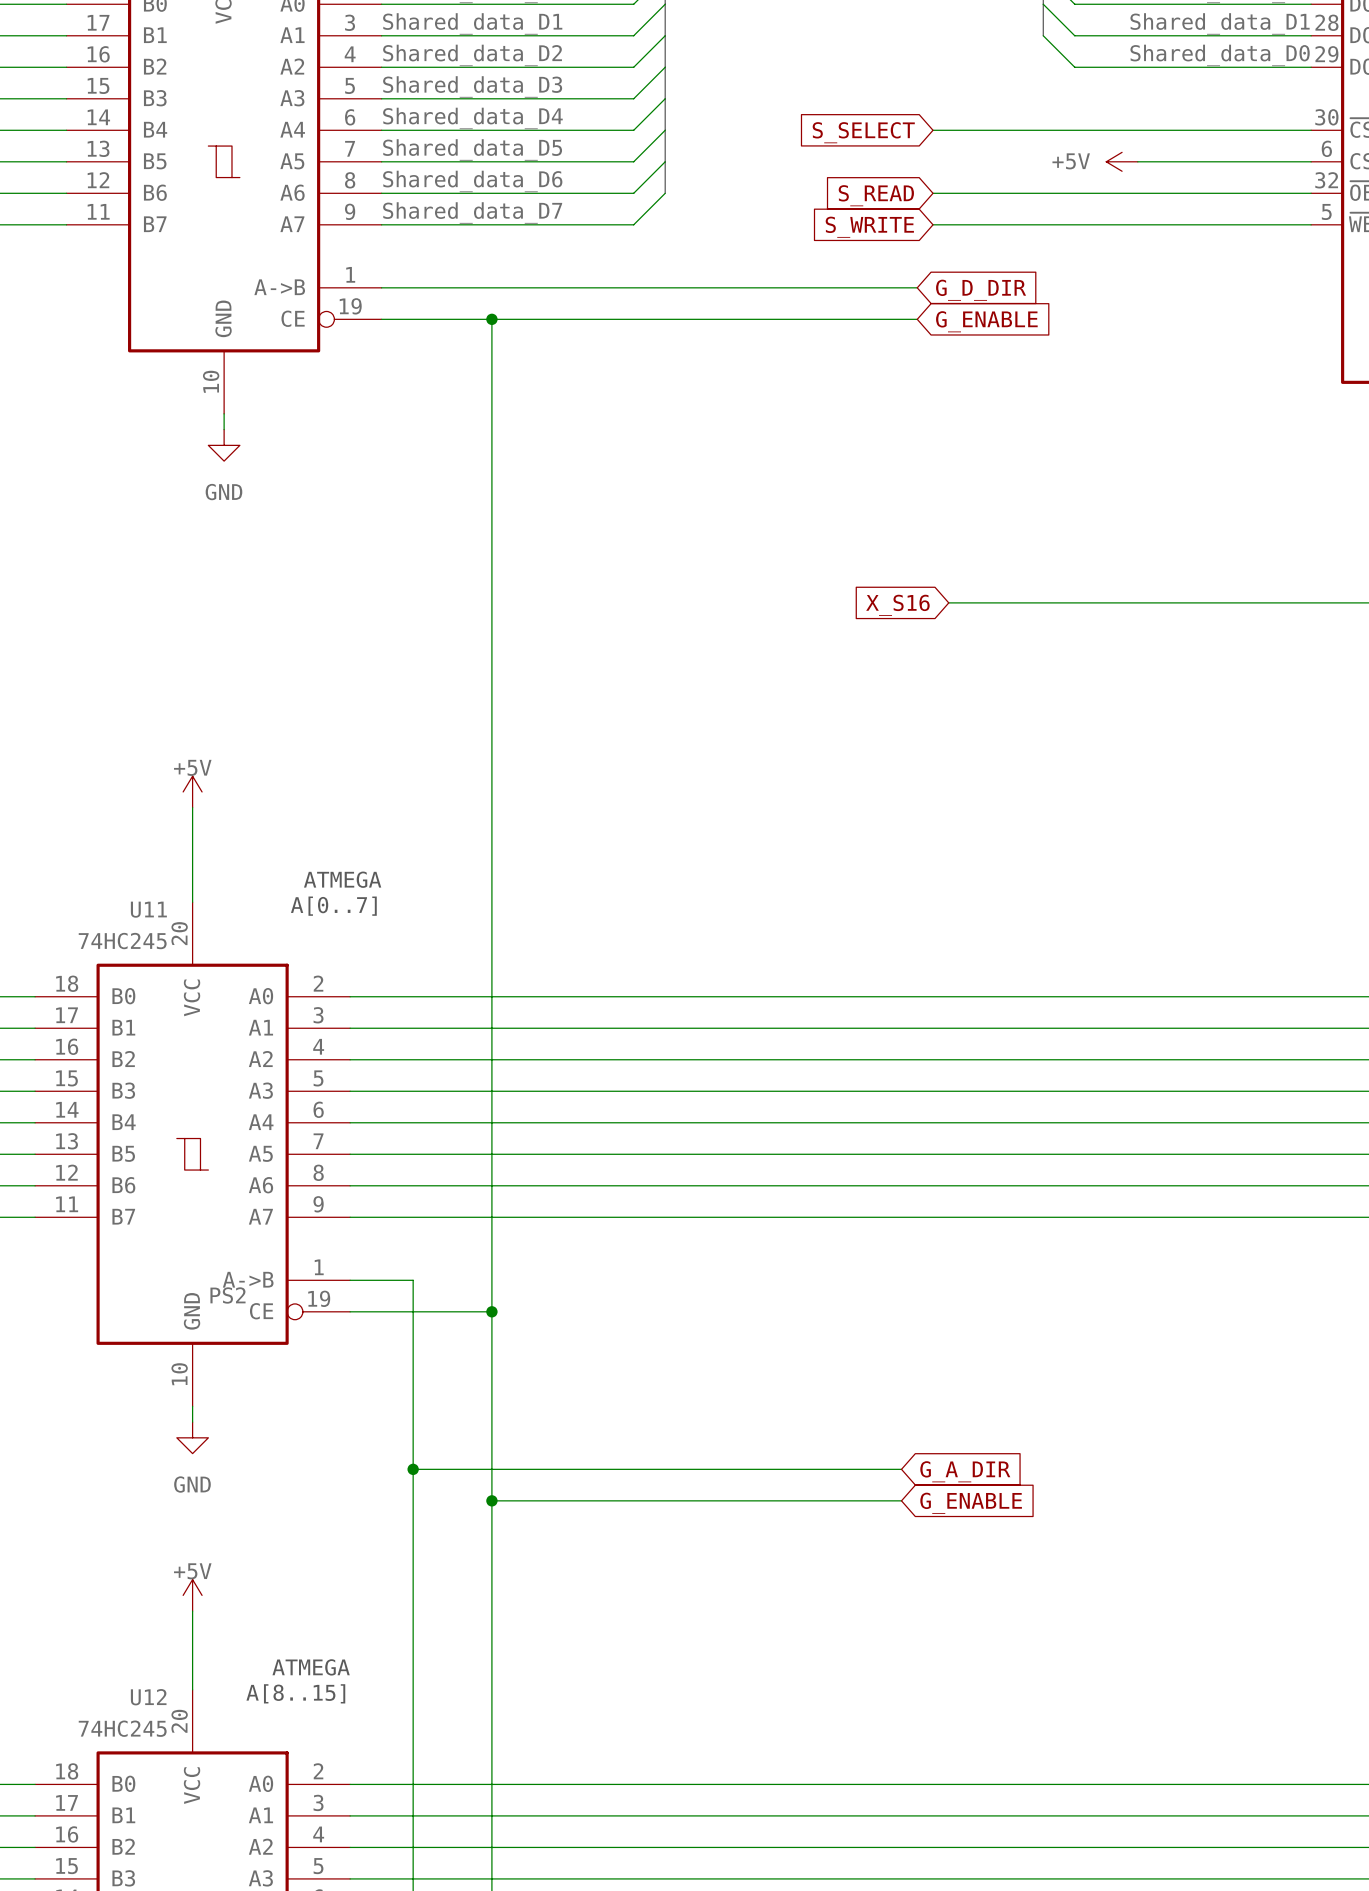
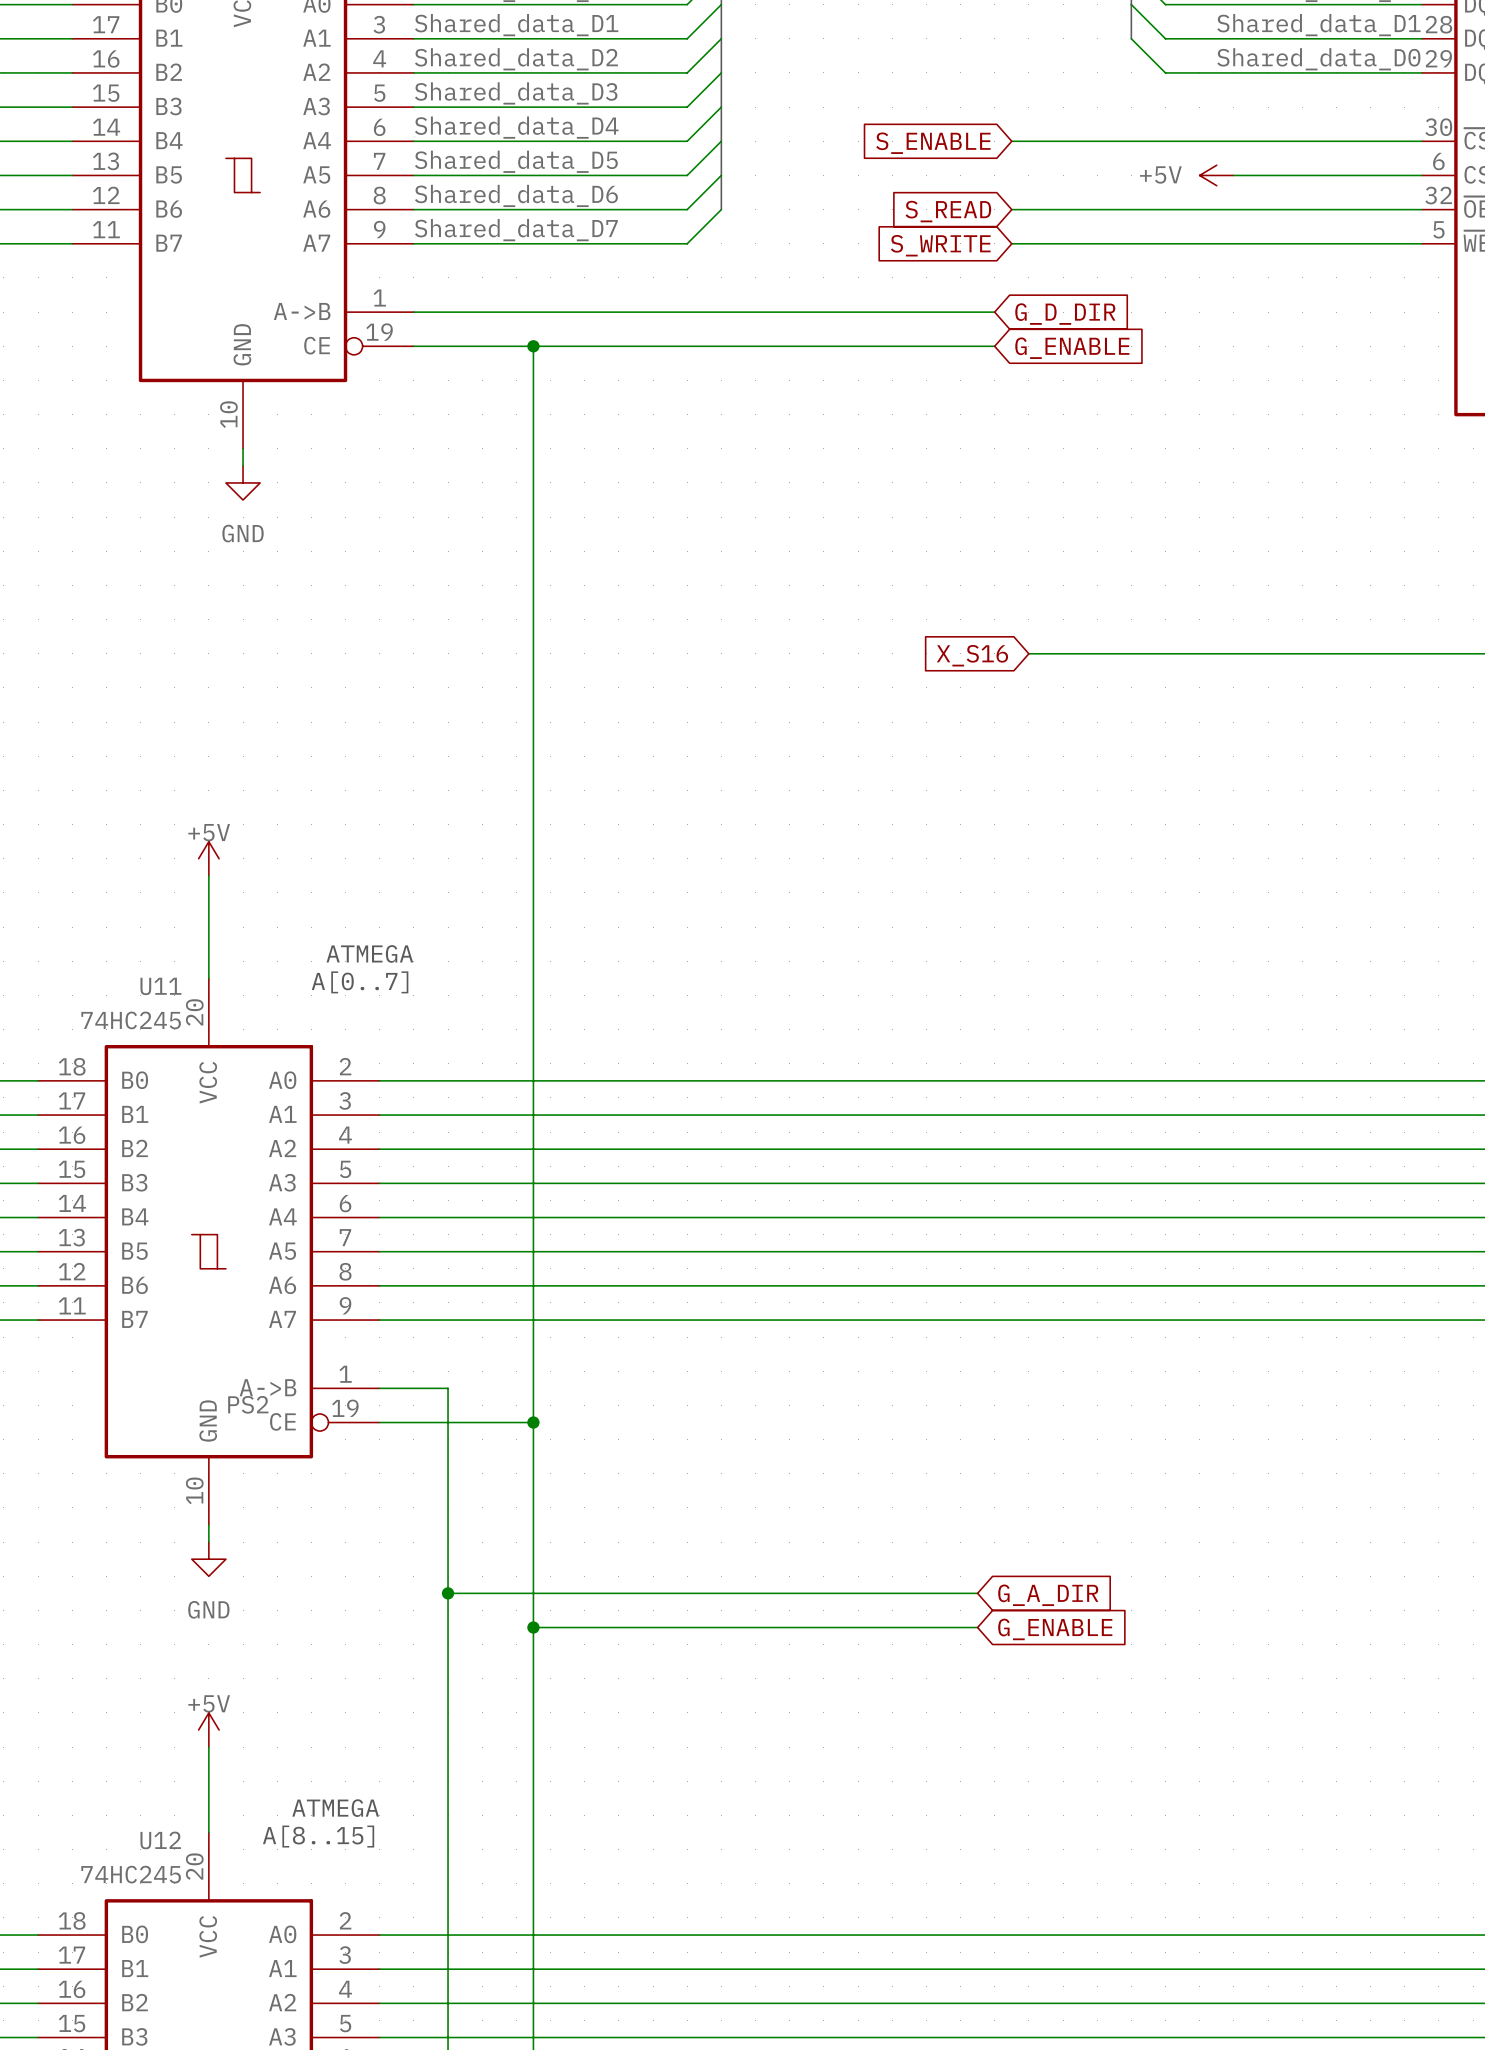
global label: S_SELECT (863, 132) -> S_ENABLE (933, 143)

